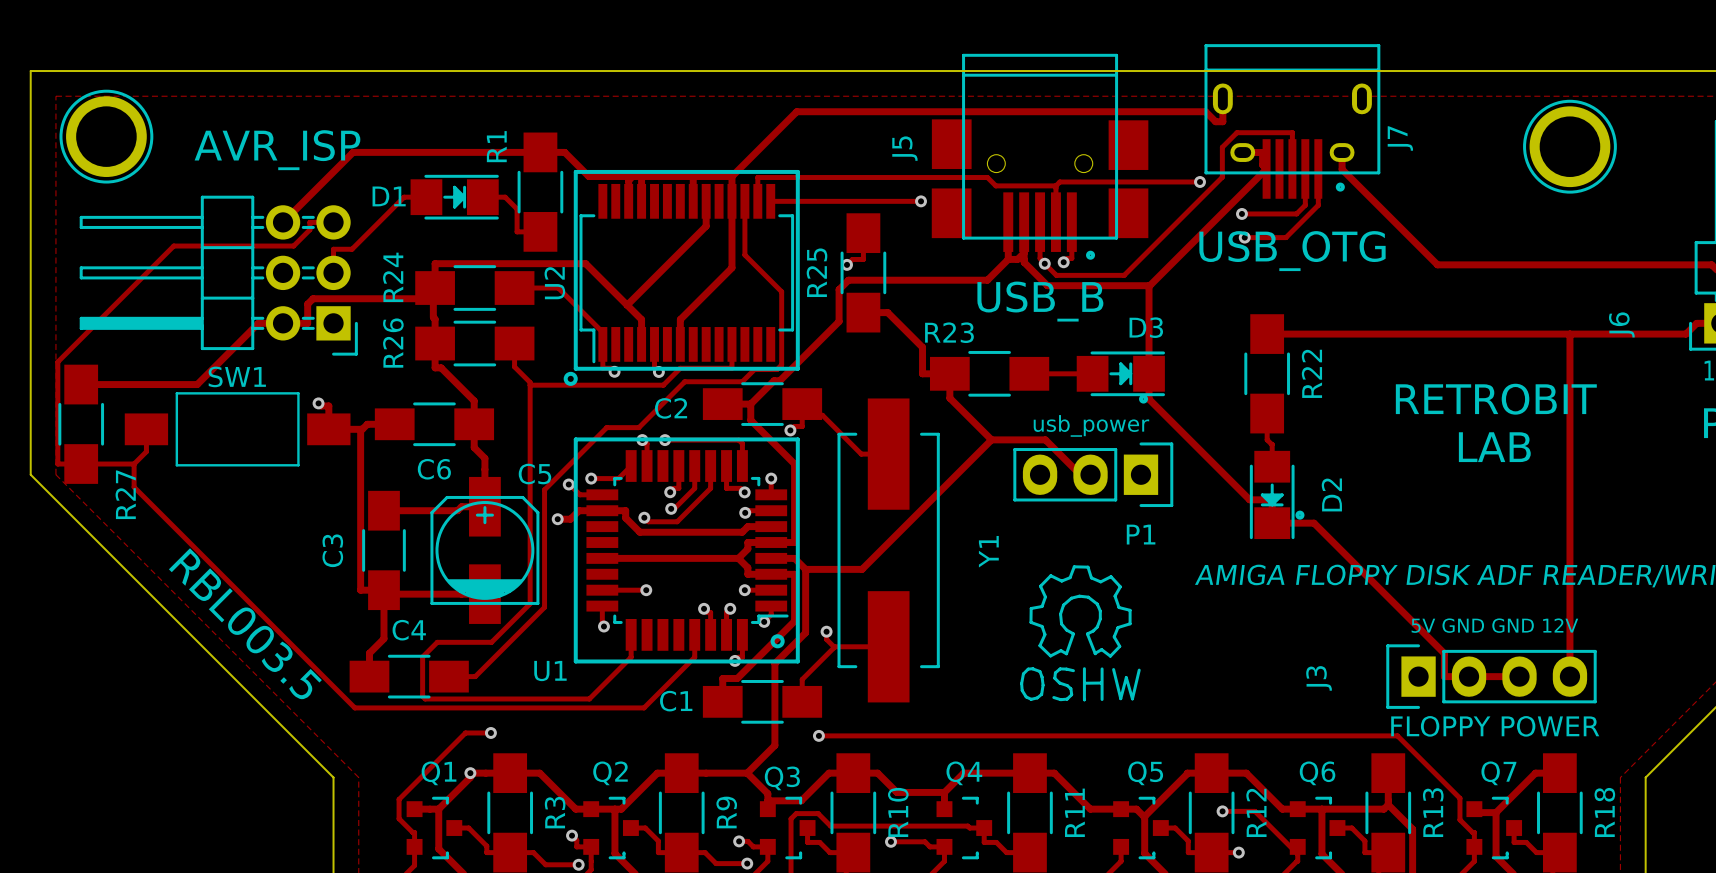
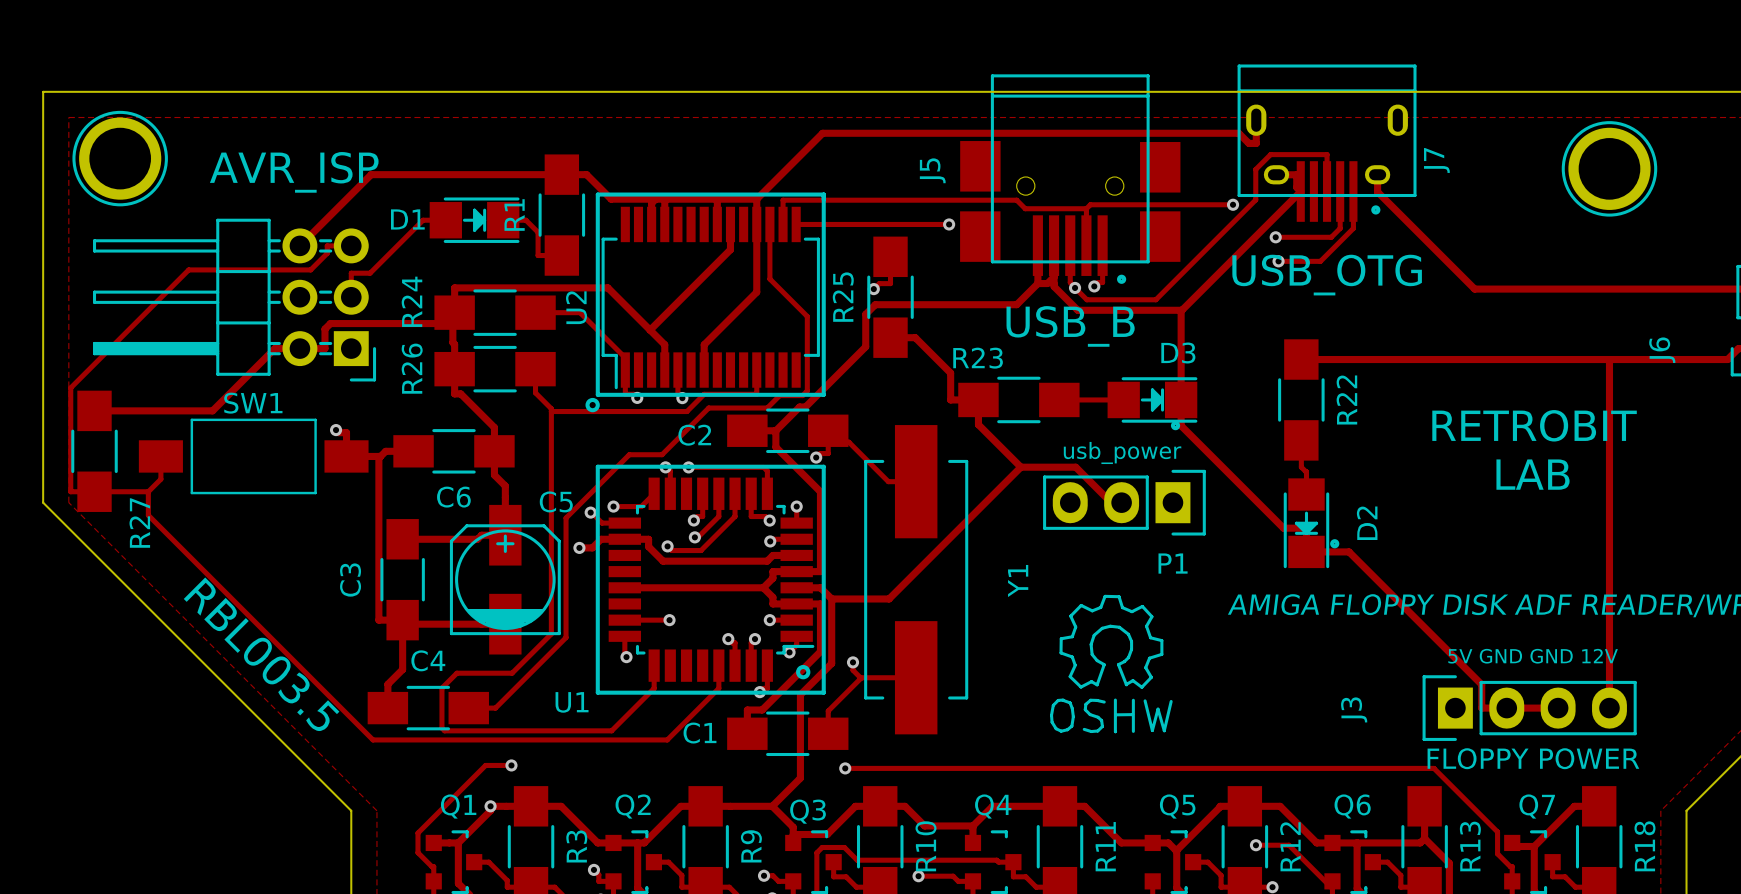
R1 name position: R1 (496, 146) -> R1 (514, 215)

